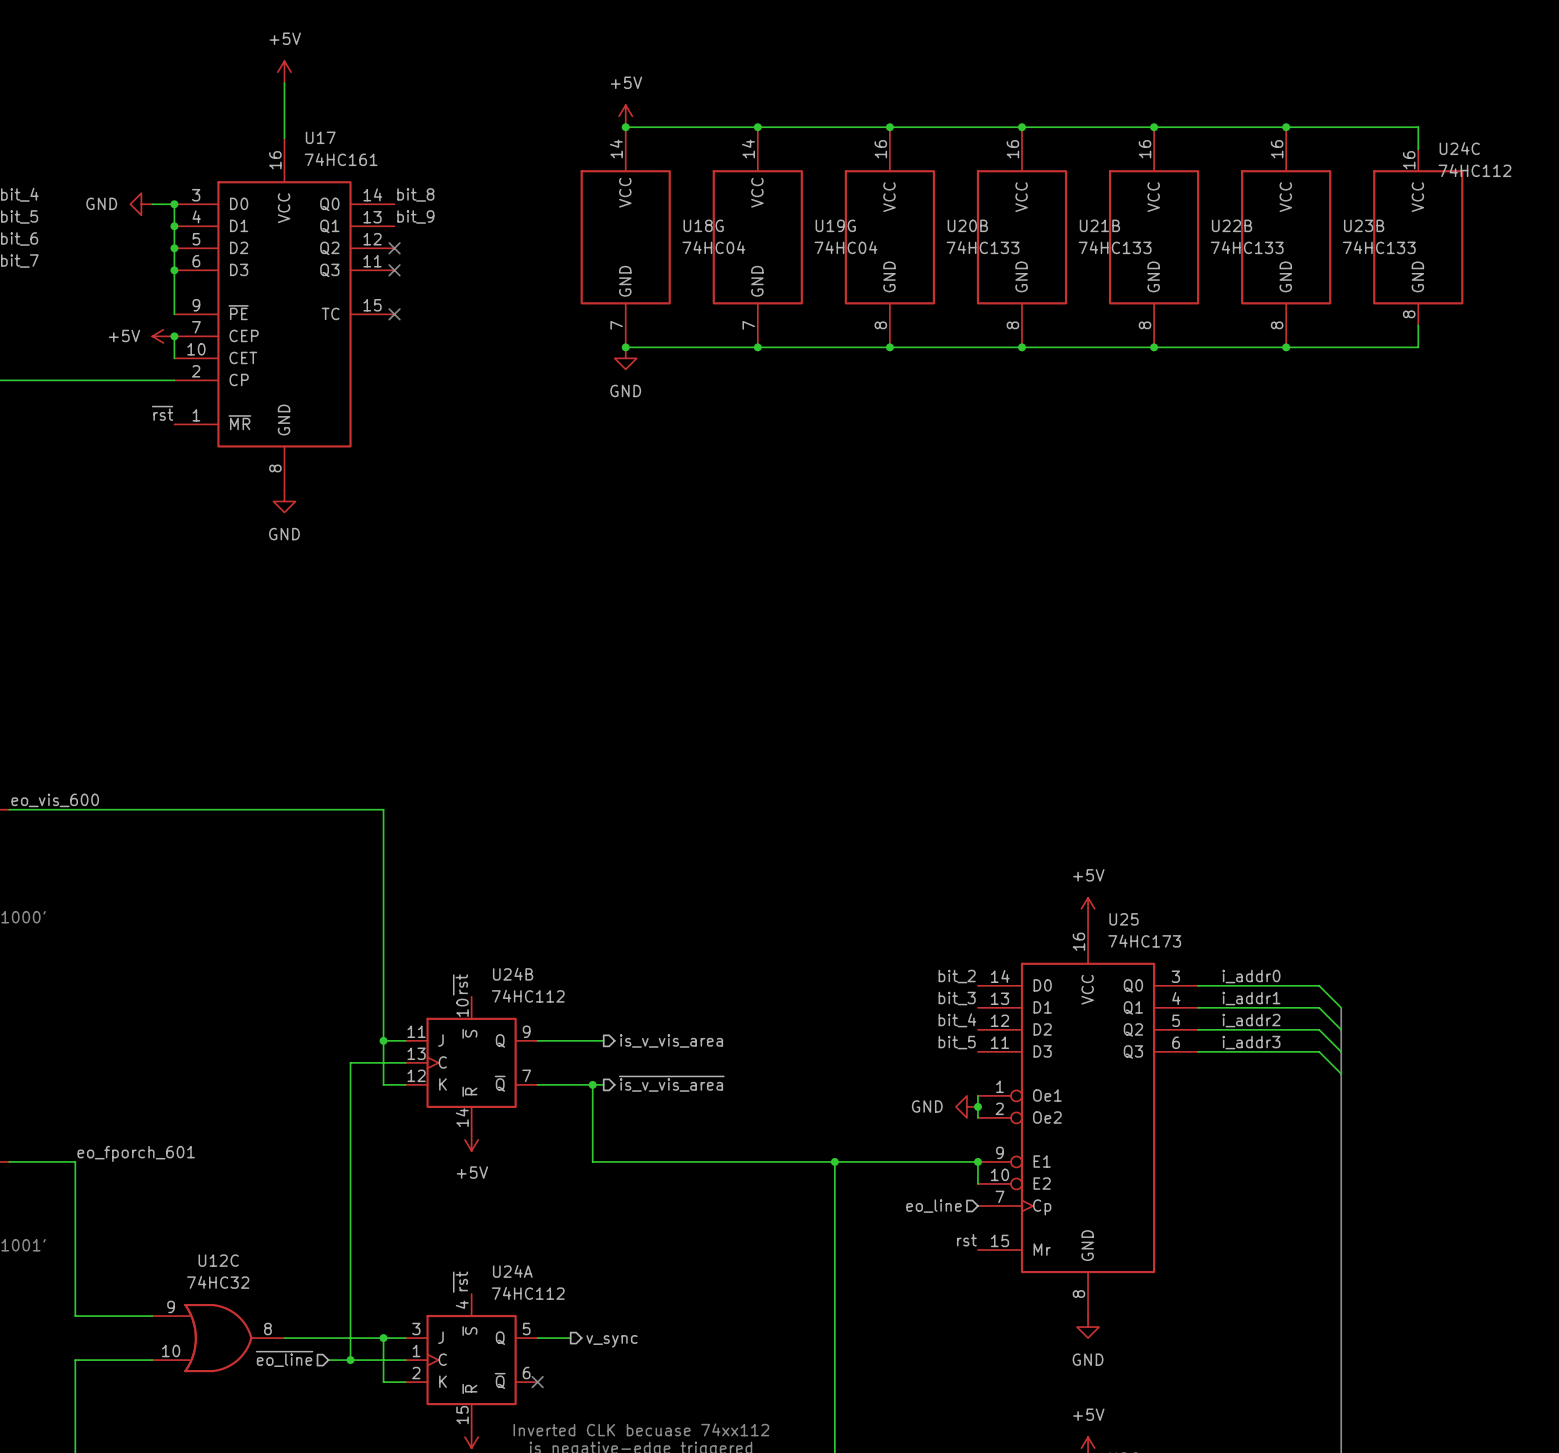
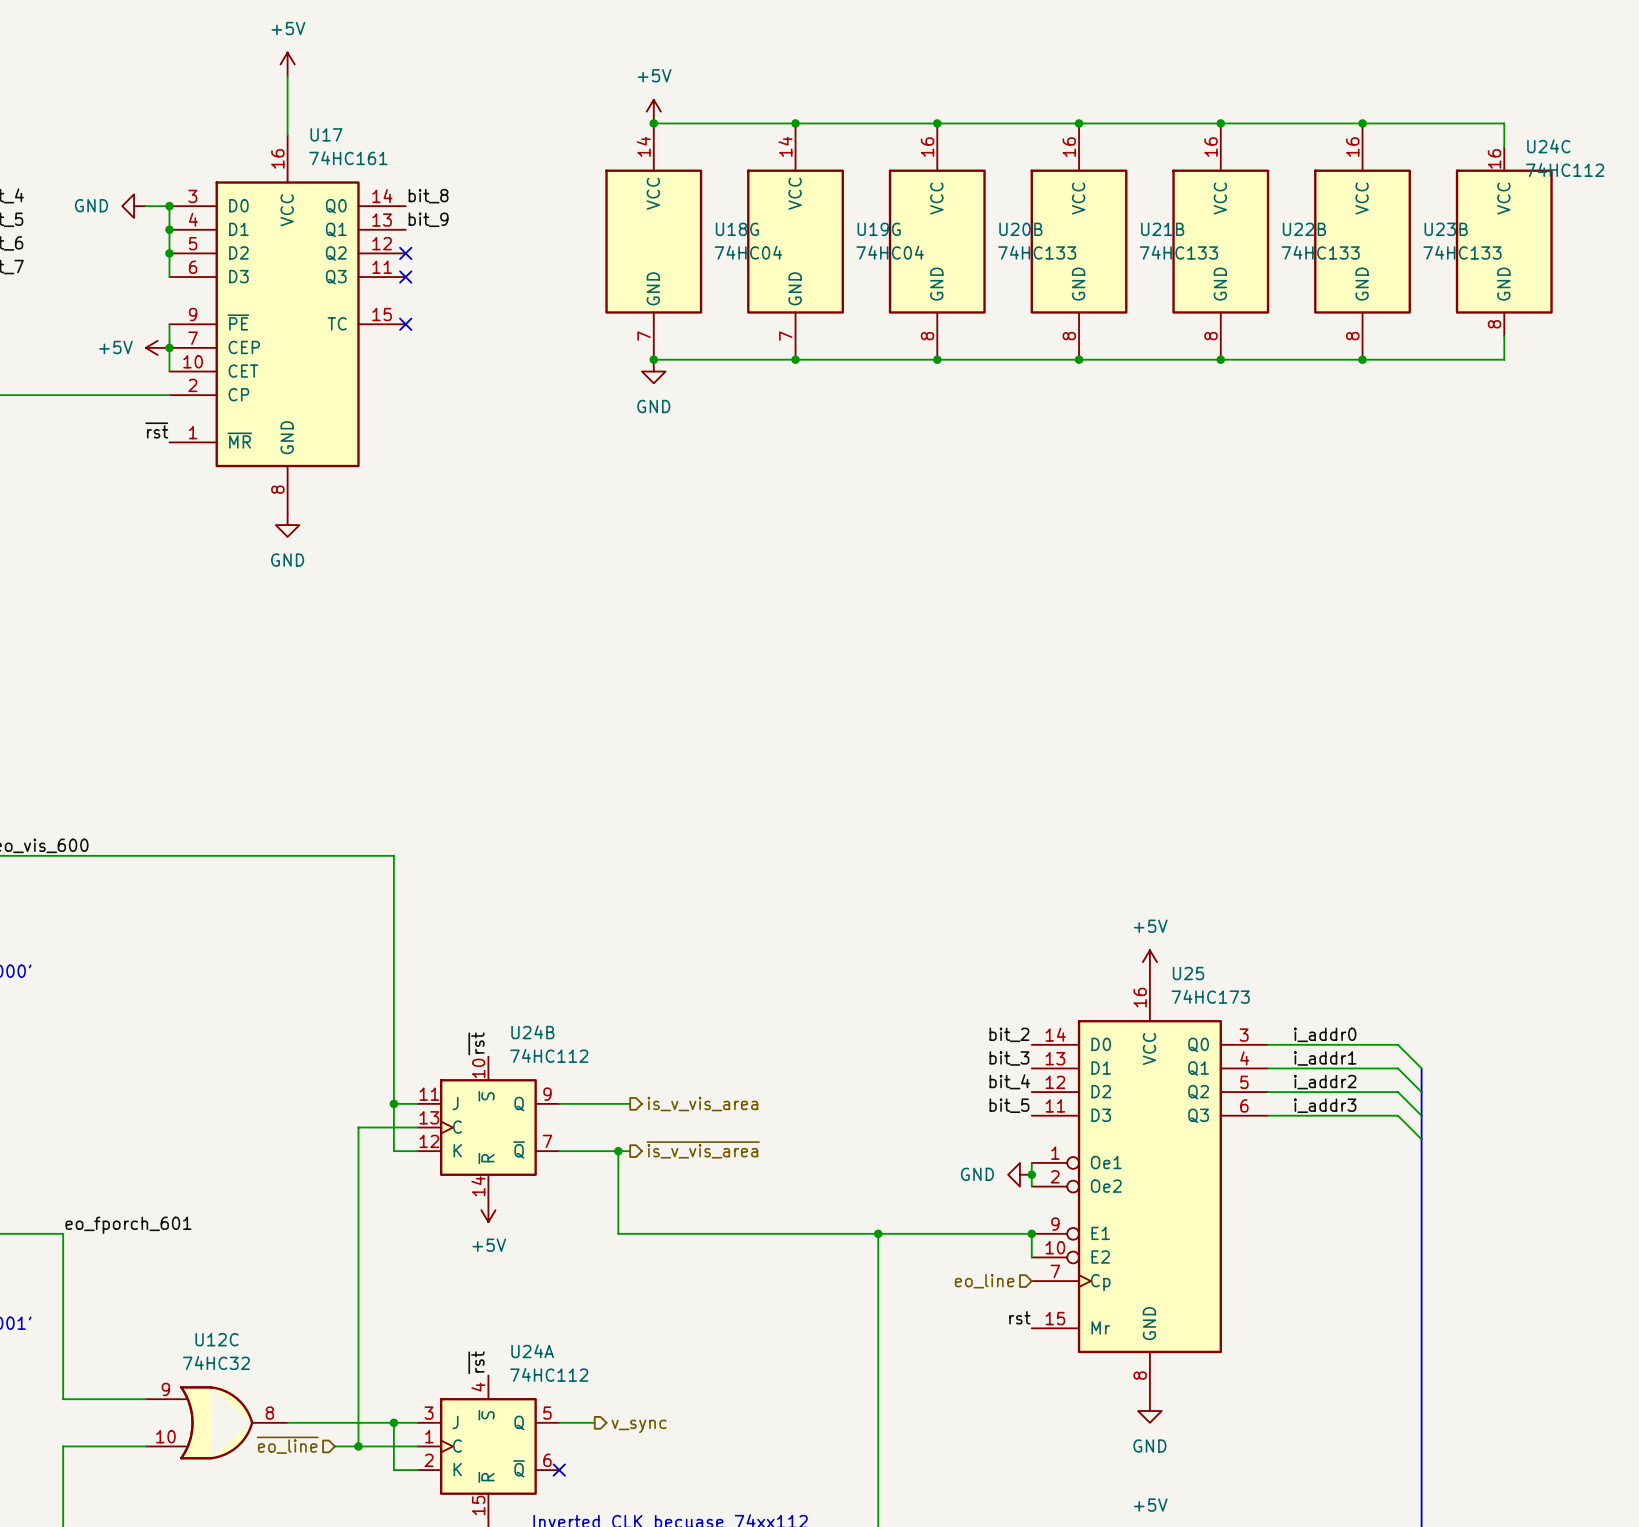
wire: (174, 270) (174, 314) -> (169, 347) (169, 324)
junction: (174, 270) -> none

